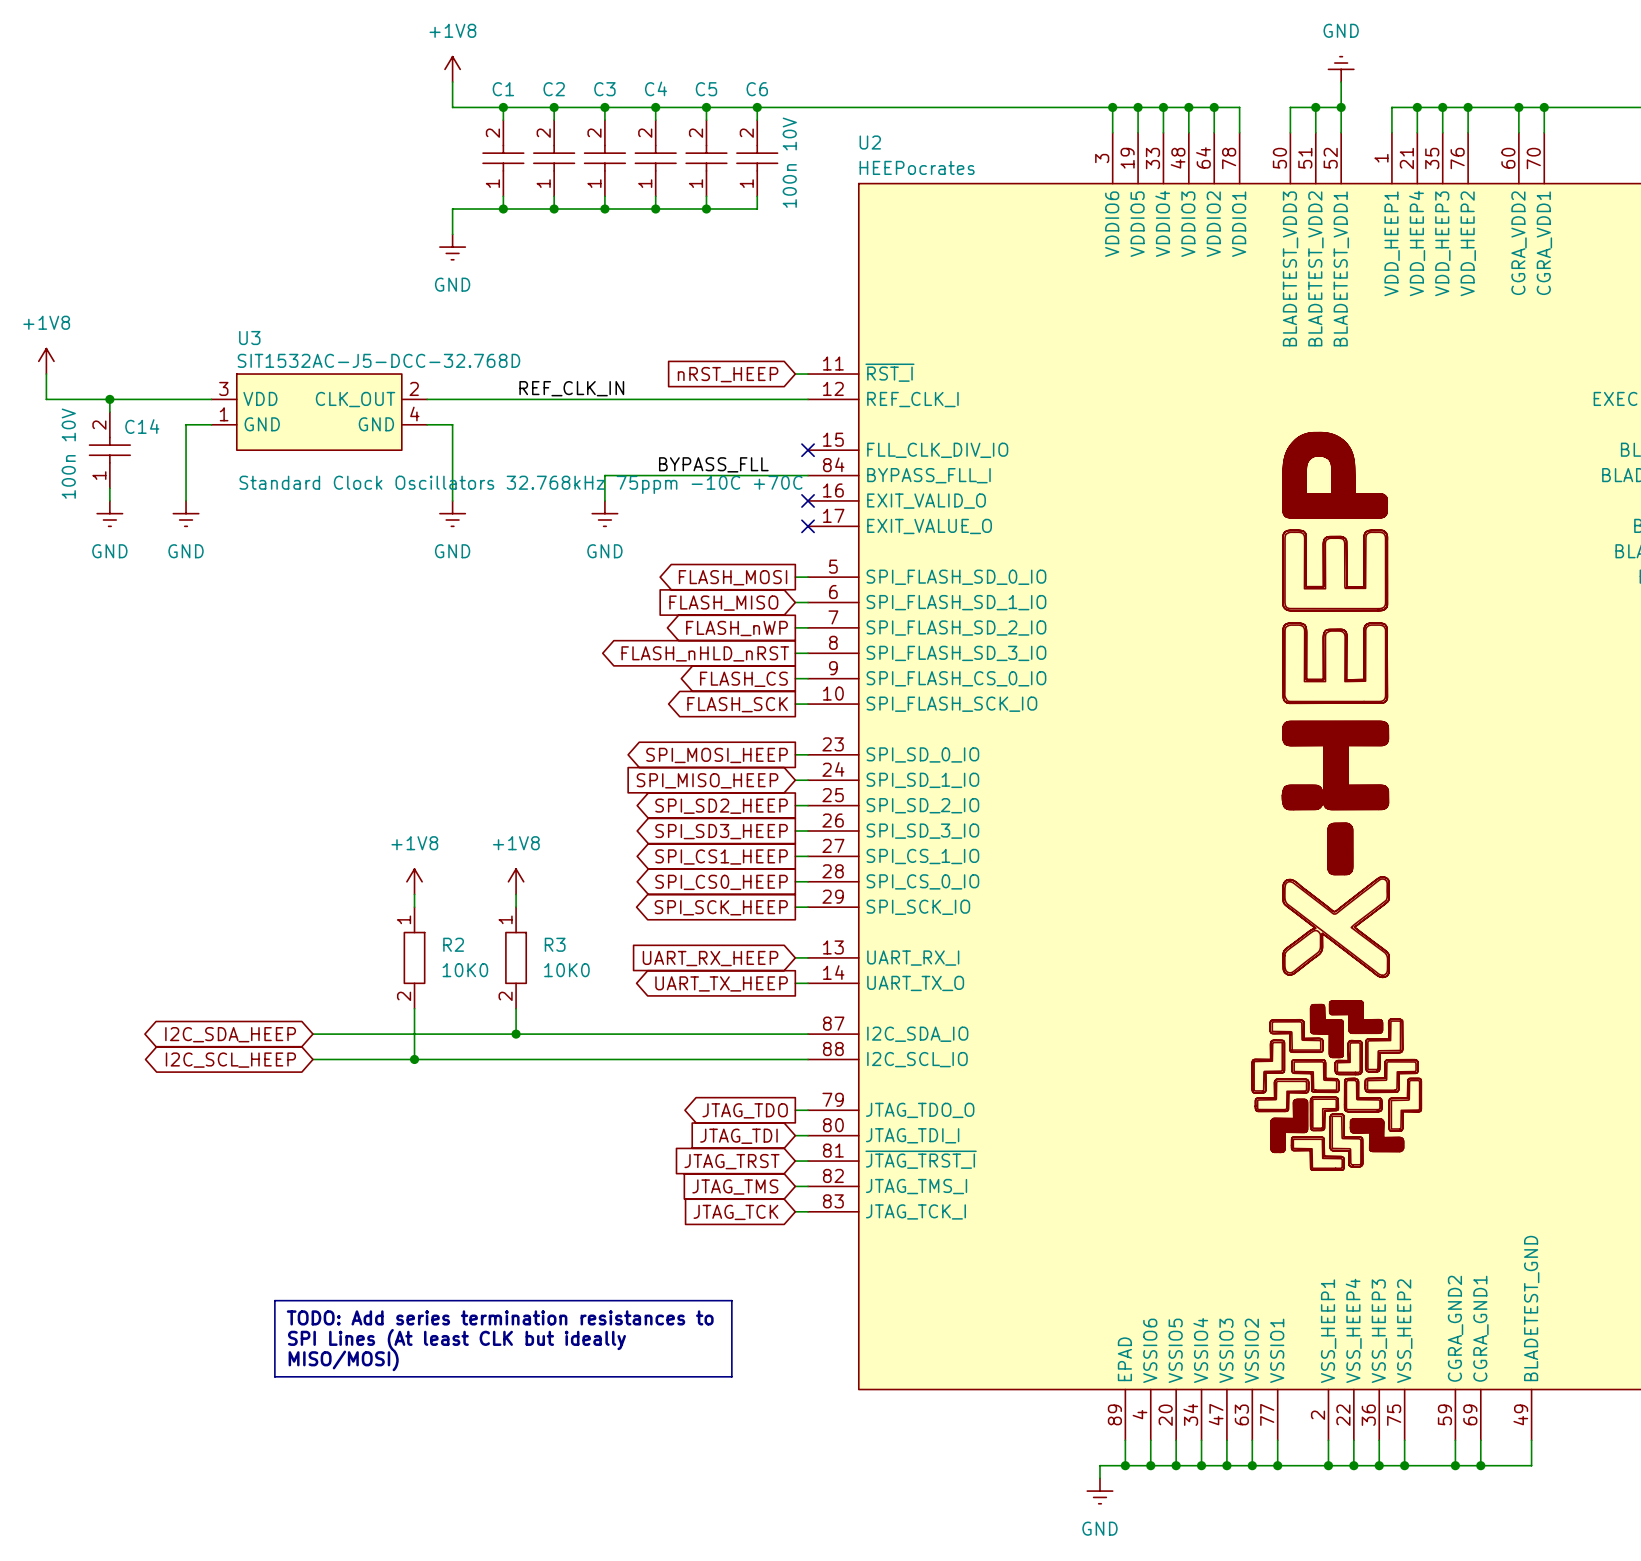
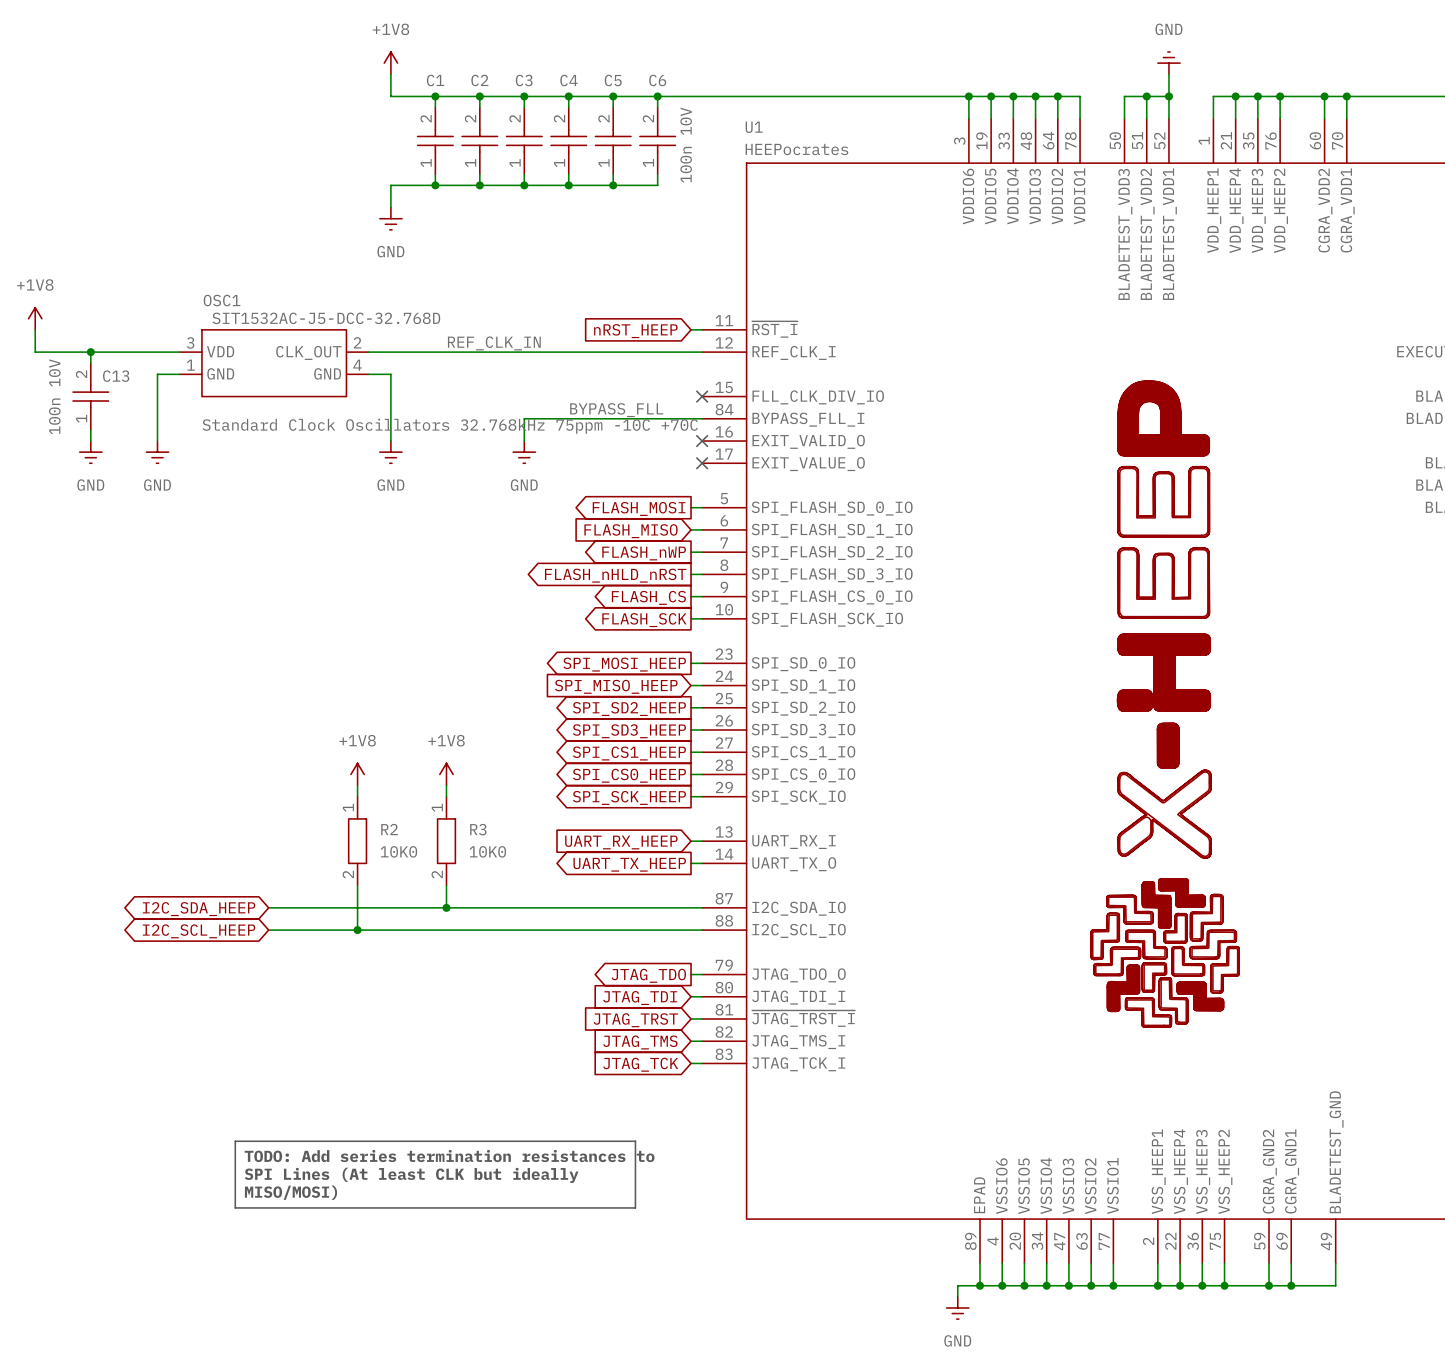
U2 name: U2 (870, 142) -> U1 (754, 127)
U3 name: U3 (249, 338) -> OSC1 (222, 300)
C14 name: C14 (142, 426) -> C13 (116, 376)

